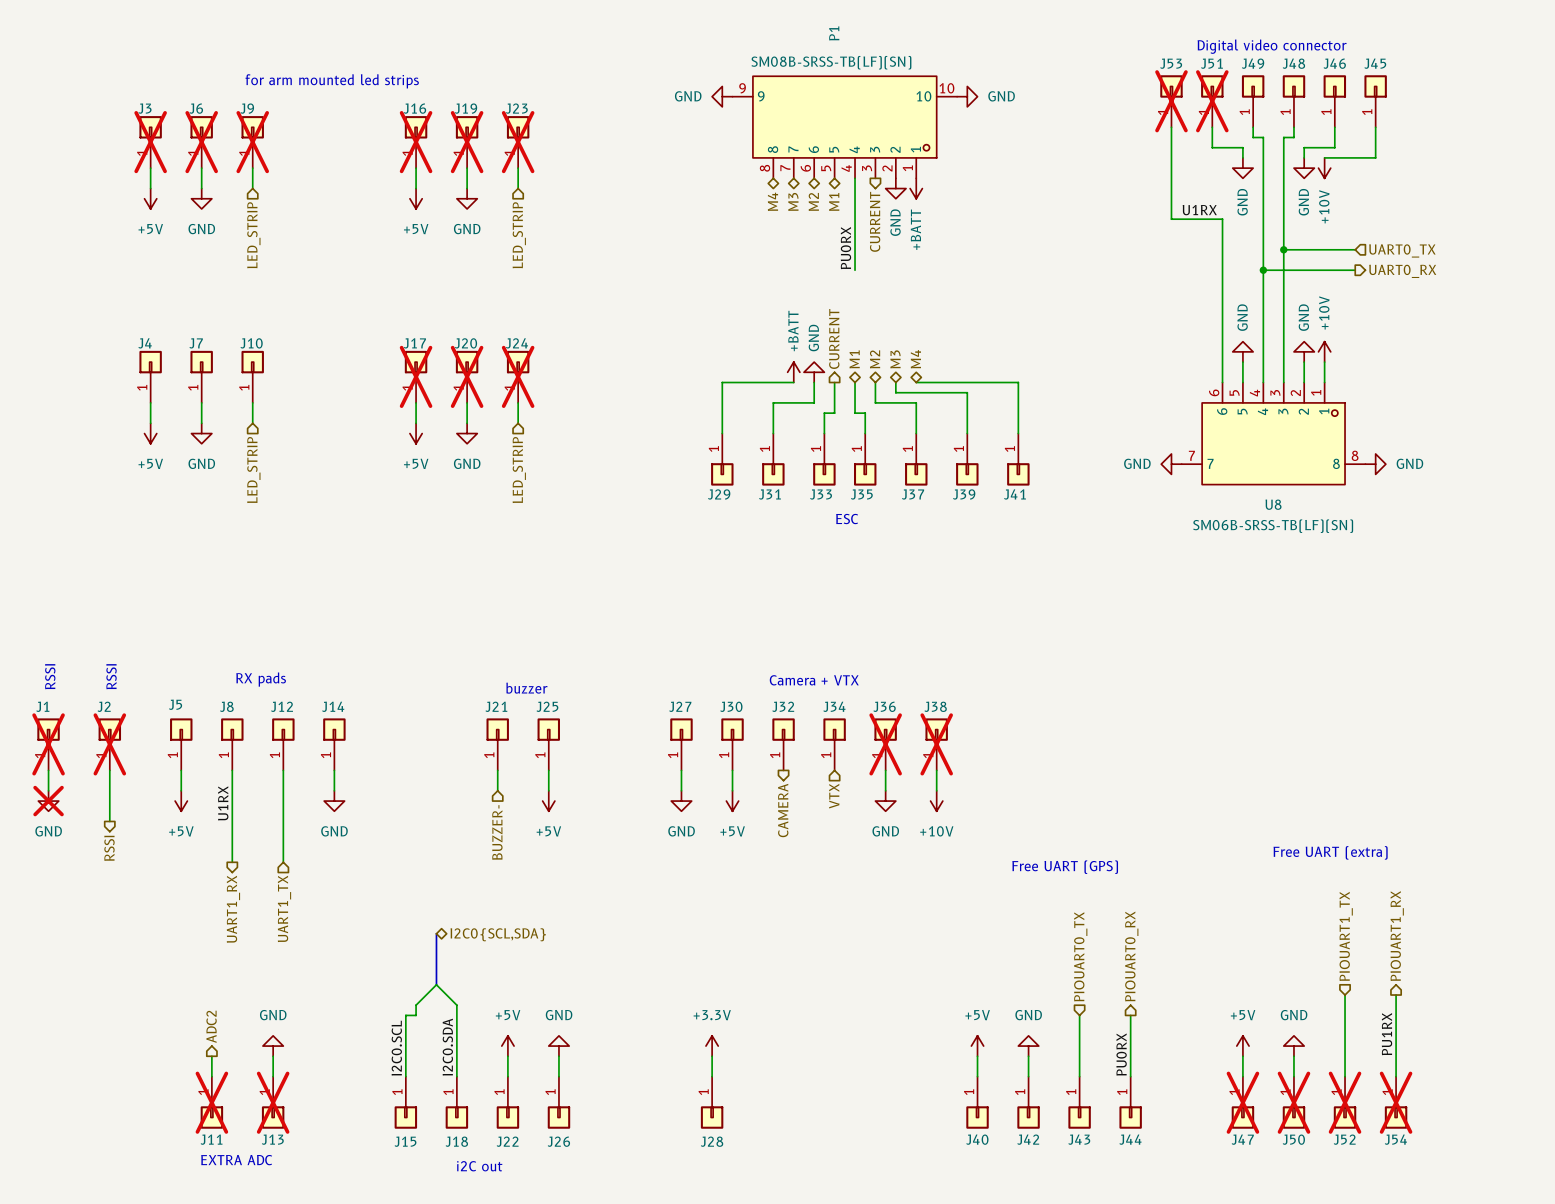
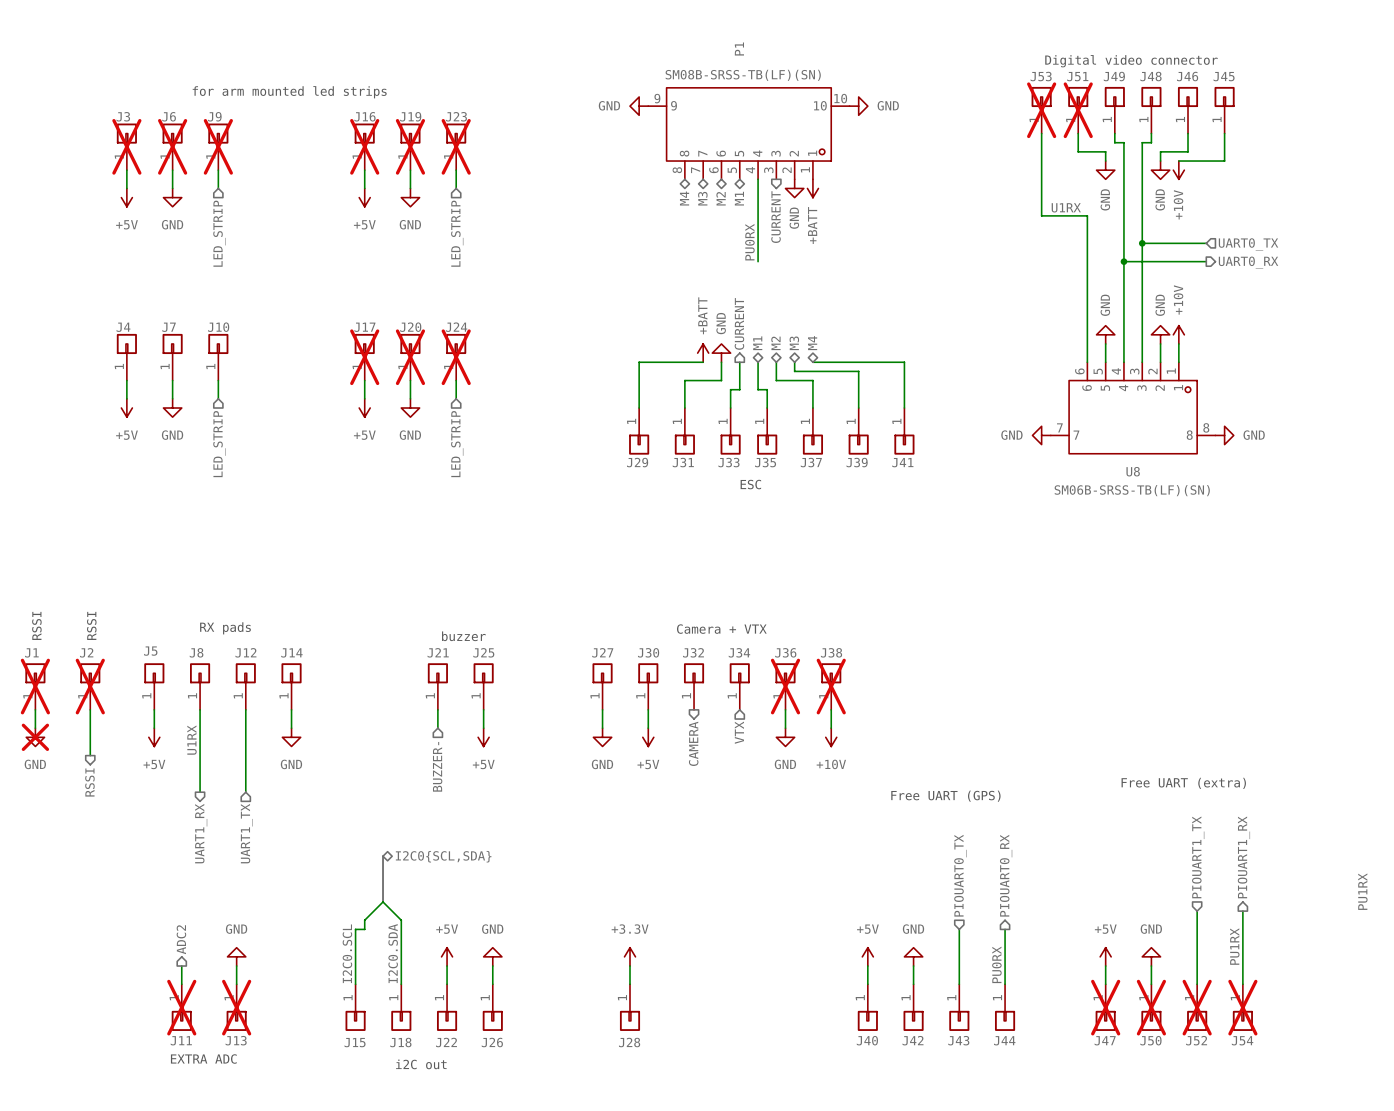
label: none -> PU1RX (1362, 891)

